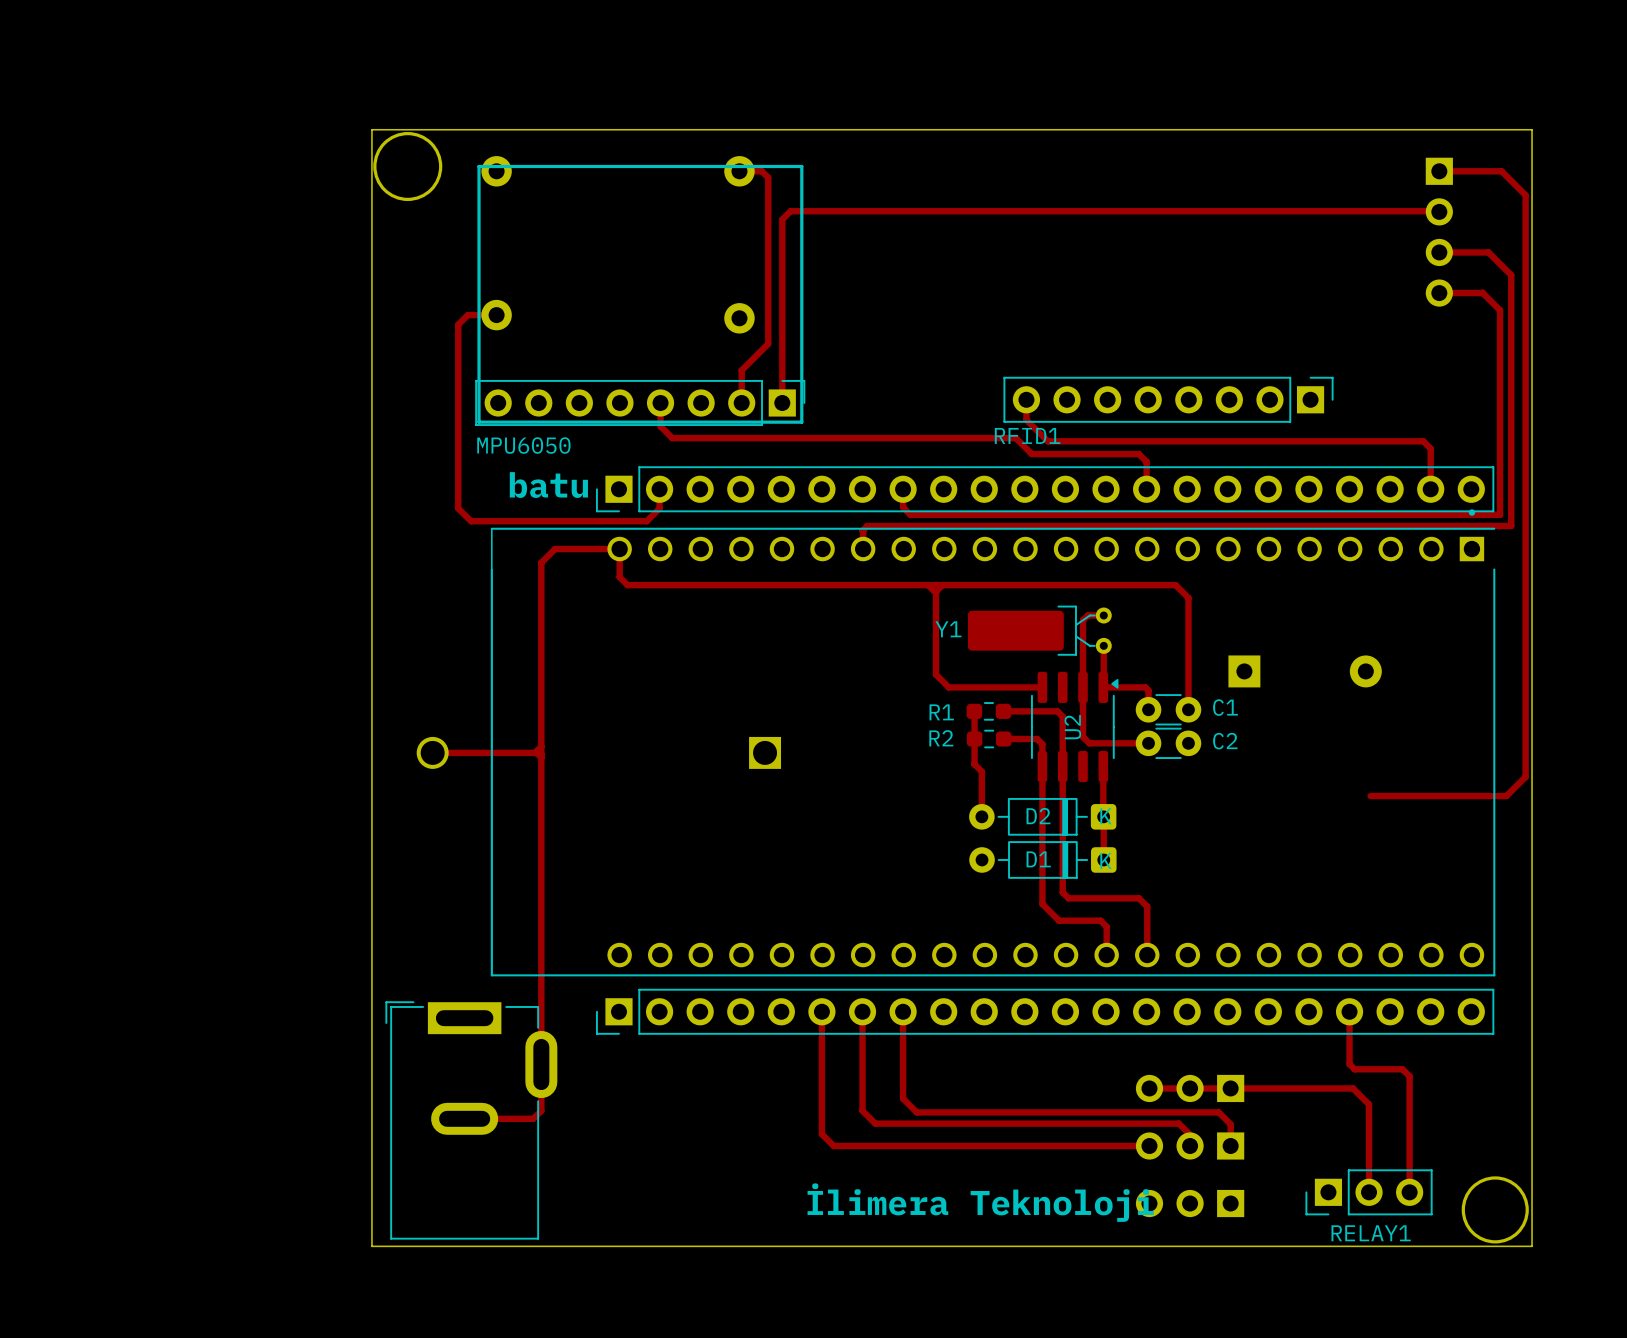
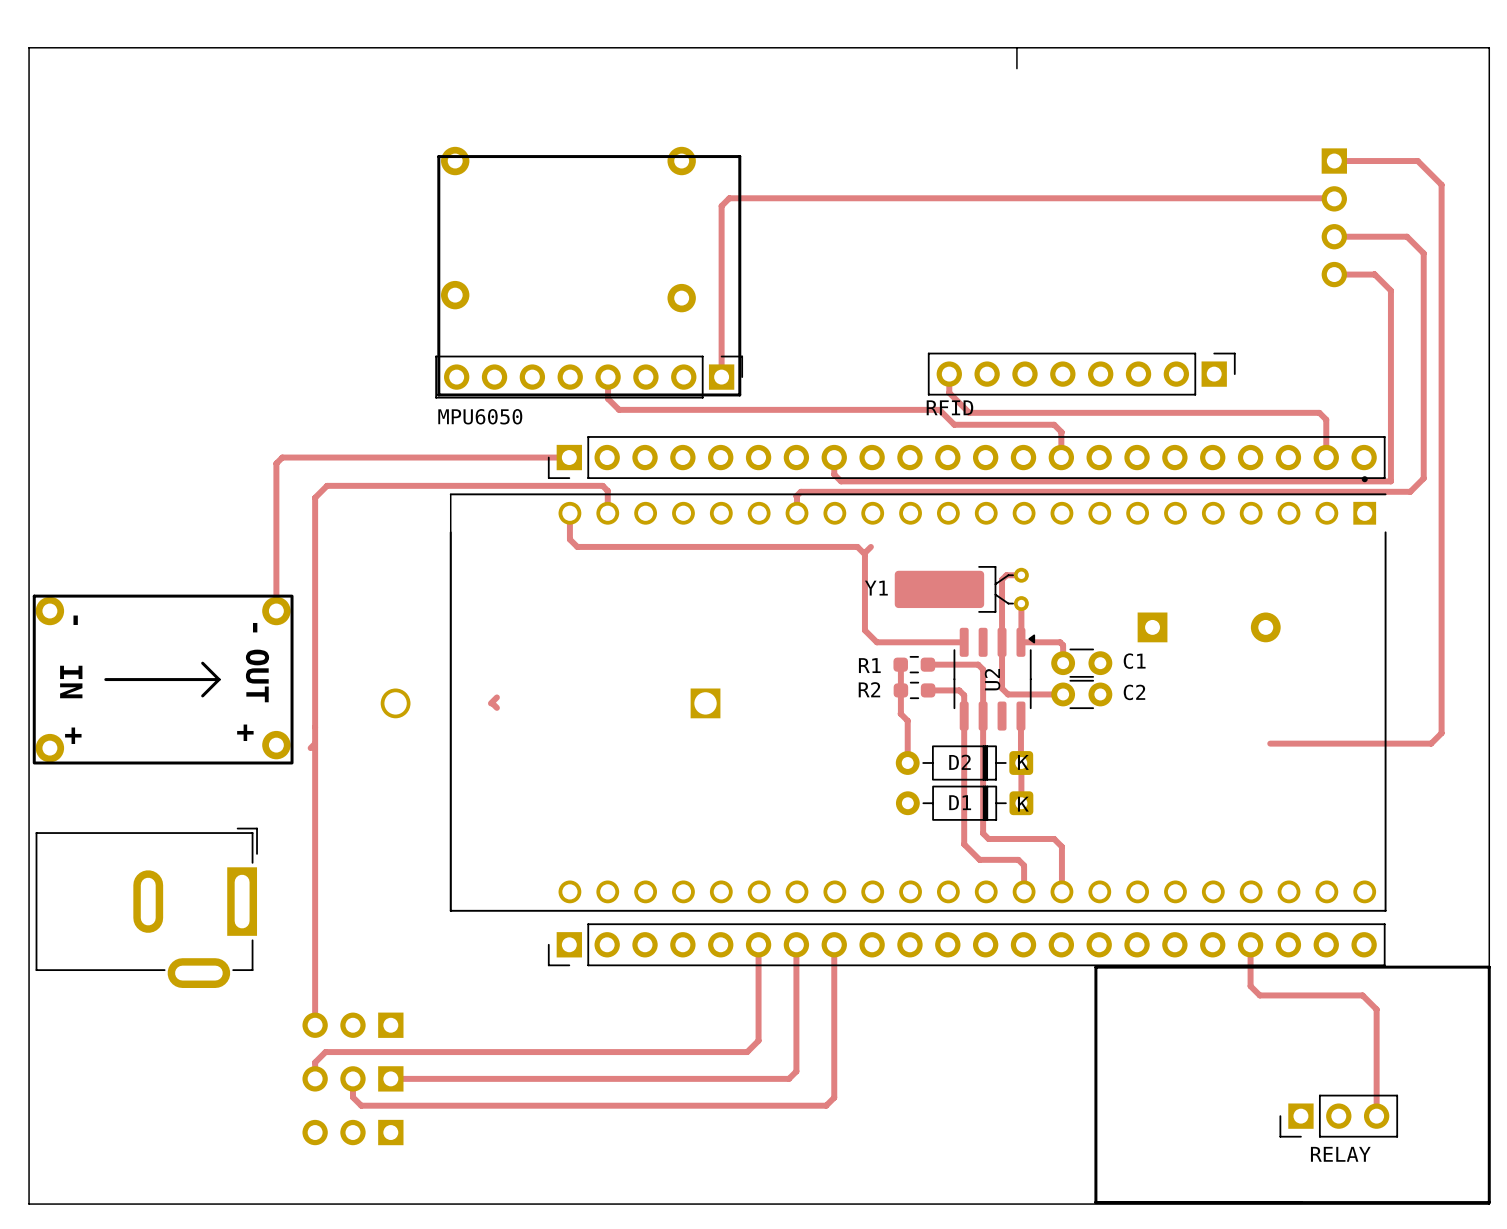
line: none -> (29, 47) (1489, 47) (1489, 1204) (29, 1204) (29, 47)
line: none -> (1016, 47) (1016, 68)
board edge: (371, 129) (1532, 129) (1532, 1246) (371, 1246) (371, 129) -> none
round board edge: [373, 132, 443, 202] -> none
track: (739, 171) (761, 171) (768, 177) (768, 343) (741, 370) (741, 402) -> none
track: (1501, 171) (1525, 195) (1525, 776) (1506, 796) -> (1392, 161) (1417, 161) (1441, 184) (1441, 733) (1431, 743) (1396, 743)
track: (1488, 252) (1511, 275) (1511, 526) -> (1380, 236) (1407, 236) (1423, 253) (1423, 478) (1410, 491) (1401, 491)
track: (496, 315) (467, 315) (458, 324) (458, 508) (471, 521) (646, 521) (659, 508) (659, 489) -> none
RFID1 name: RFID1 (1027, 435) -> RFID (949, 407)
text: batu (548, 485) -> none
track: none -> (569, 457) (282, 457) (276, 463) (276, 611)
track: (619, 549) (555, 549) (541, 562) (541, 1110) (533, 1118) (464, 1118) -> none
track: none -> (607, 513) (607, 490) (602, 485) (327, 485) (315, 497) (315, 1025)
track: (928, 585) (1175, 585) (1188, 597) (1188, 709) -> none
part: none -> (163, 679)
track: (432, 752) (539, 752) (541, 754) -> none
track: none -> (315, 743) (310, 748)
line: none -> (1095, 967) (1489, 967) (1489, 1202) (1095, 1202) (1095, 967)
track: (1349, 1056) (1349, 1064) (1354, 1069) (1402, 1069) (1409, 1076) (1409, 1192) -> (1250, 986) (1259, 995) (1362, 995) (1376, 1009) (1376, 1116)
track: (1149, 1088) (1353, 1088) (1369, 1104) (1369, 1192) -> none
part: (1190, 1088) -> none
part: none -> (352, 1025)
track: (903, 1098) (916, 1112) (1218, 1112) (1230, 1124) (1230, 1145) -> (834, 1025) (834, 1097) (826, 1105) (361, 1105) (352, 1097) (352, 1078)
track: (862, 1110) (875, 1123) (1178, 1123) (1190, 1134) (1190, 1145) -> (796, 1037) (796, 1071) (788, 1078) (390, 1078)
track: (821, 1114) (821, 1134) (833, 1145) (1149, 1145) -> (758, 1040) (747, 1052) (325, 1052) (315, 1062) (315, 1078)
part rotation: 0° (471, 1120) -> 90° clockwise (146, 907)
part position: (471, 1120) -> (146, 907)
part: (1190, 1145) -> none
part: none -> (352, 1078)
round board edge: [1461, 1176, 1529, 1244] -> none
RELAY1: (1369, 1192) -> none
RELAY: none -> (1338, 1116)
text: İlimera Teknoloji (980, 1202) -> none
part: (1190, 1203) -> none
part: none -> (352, 1132)

